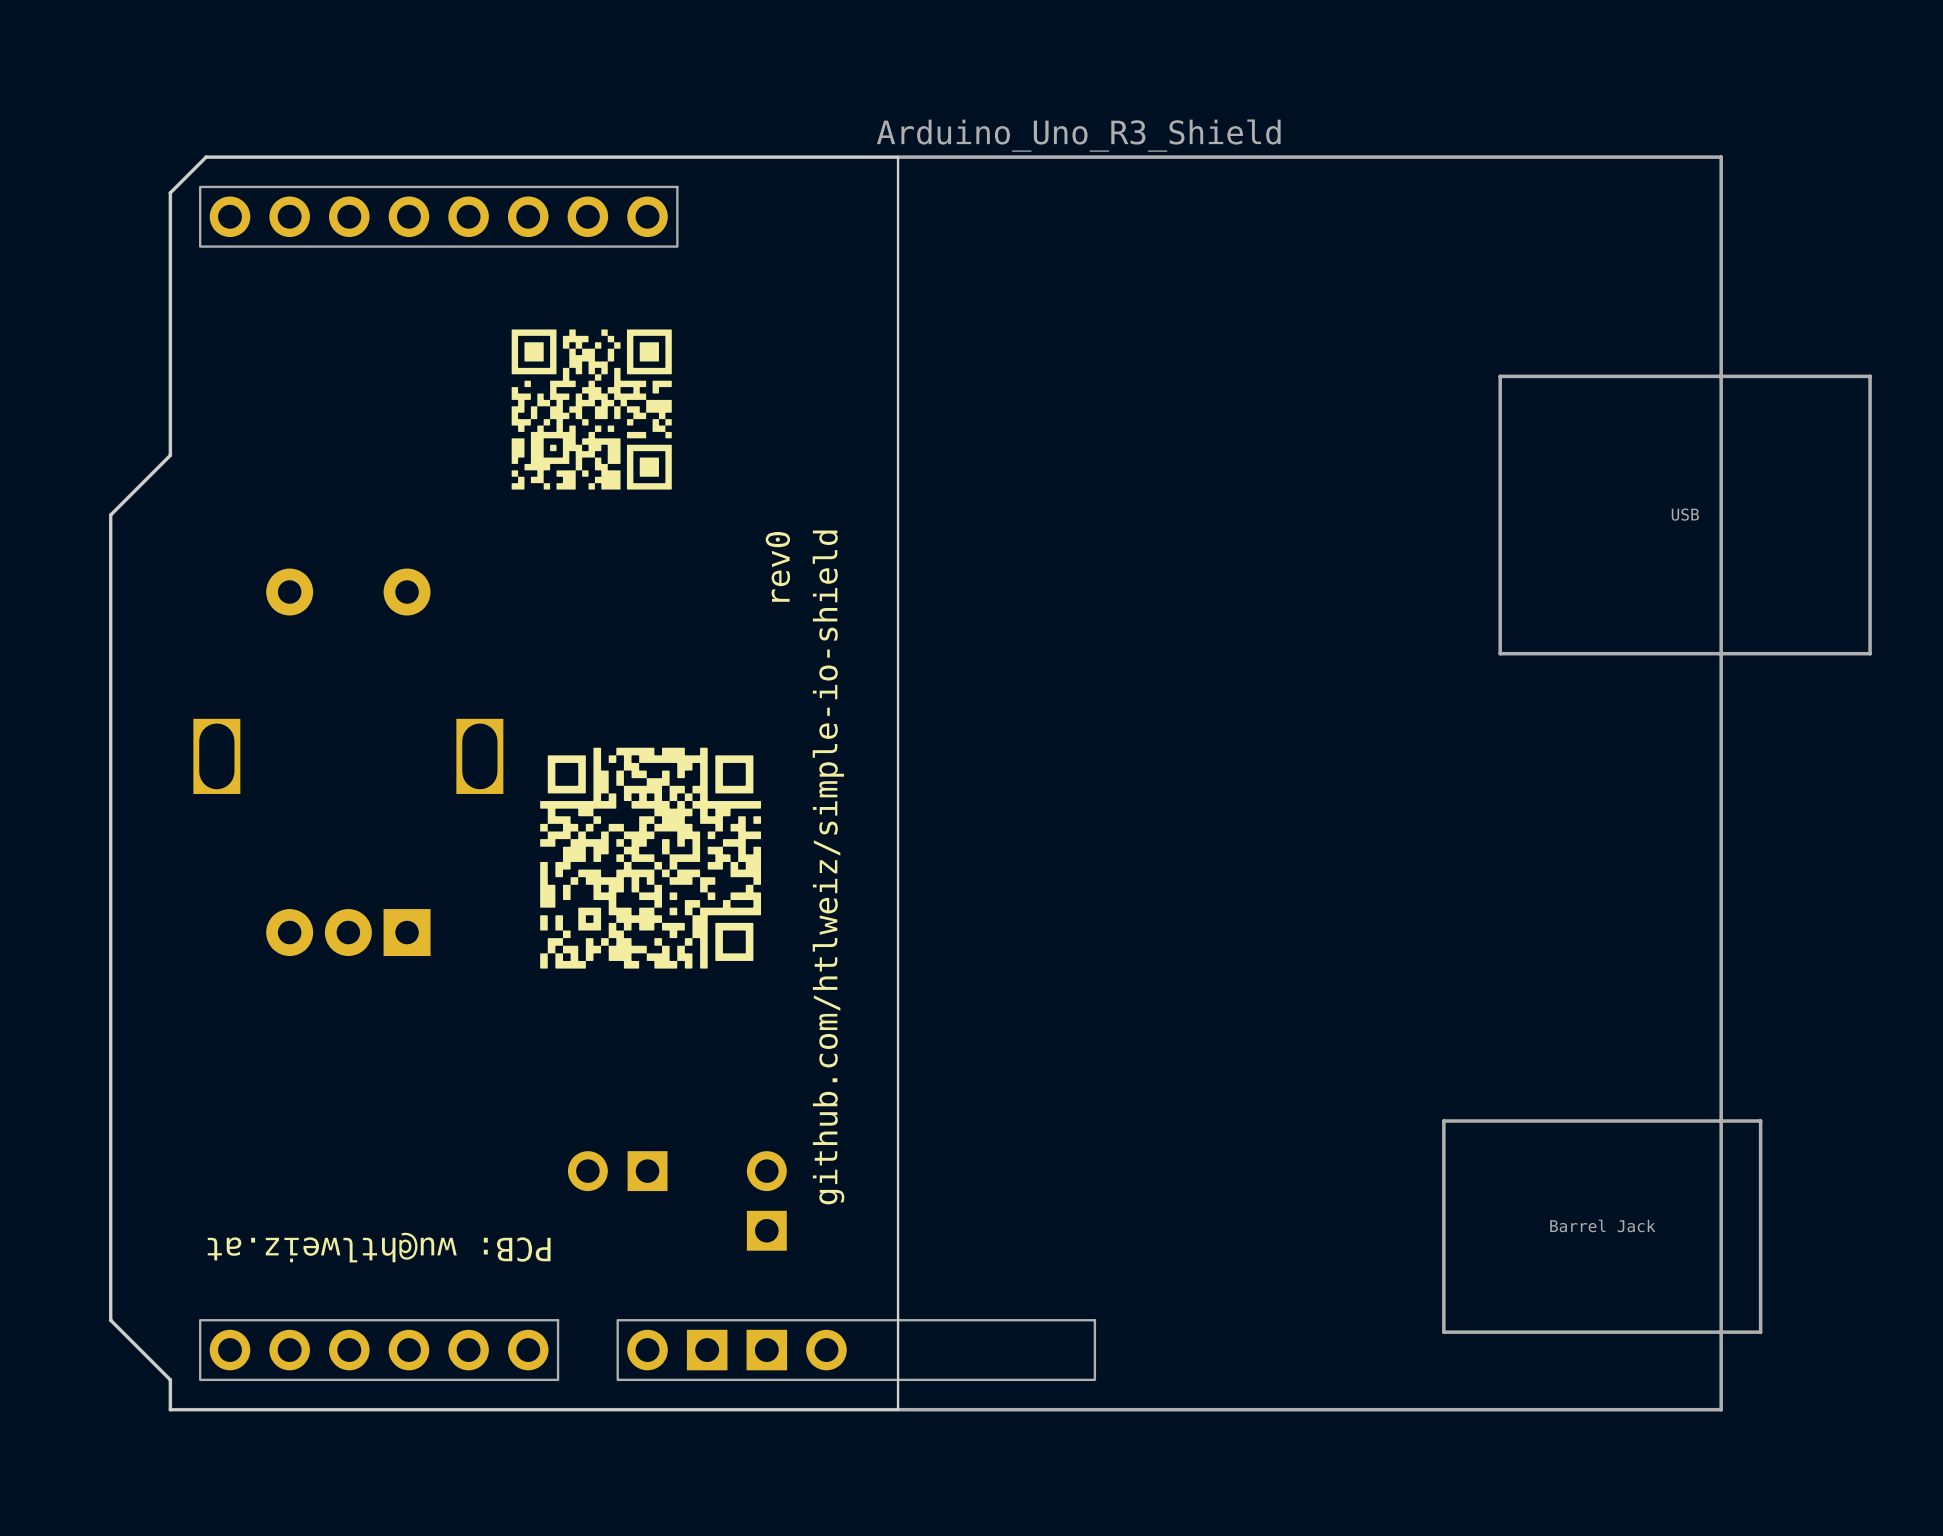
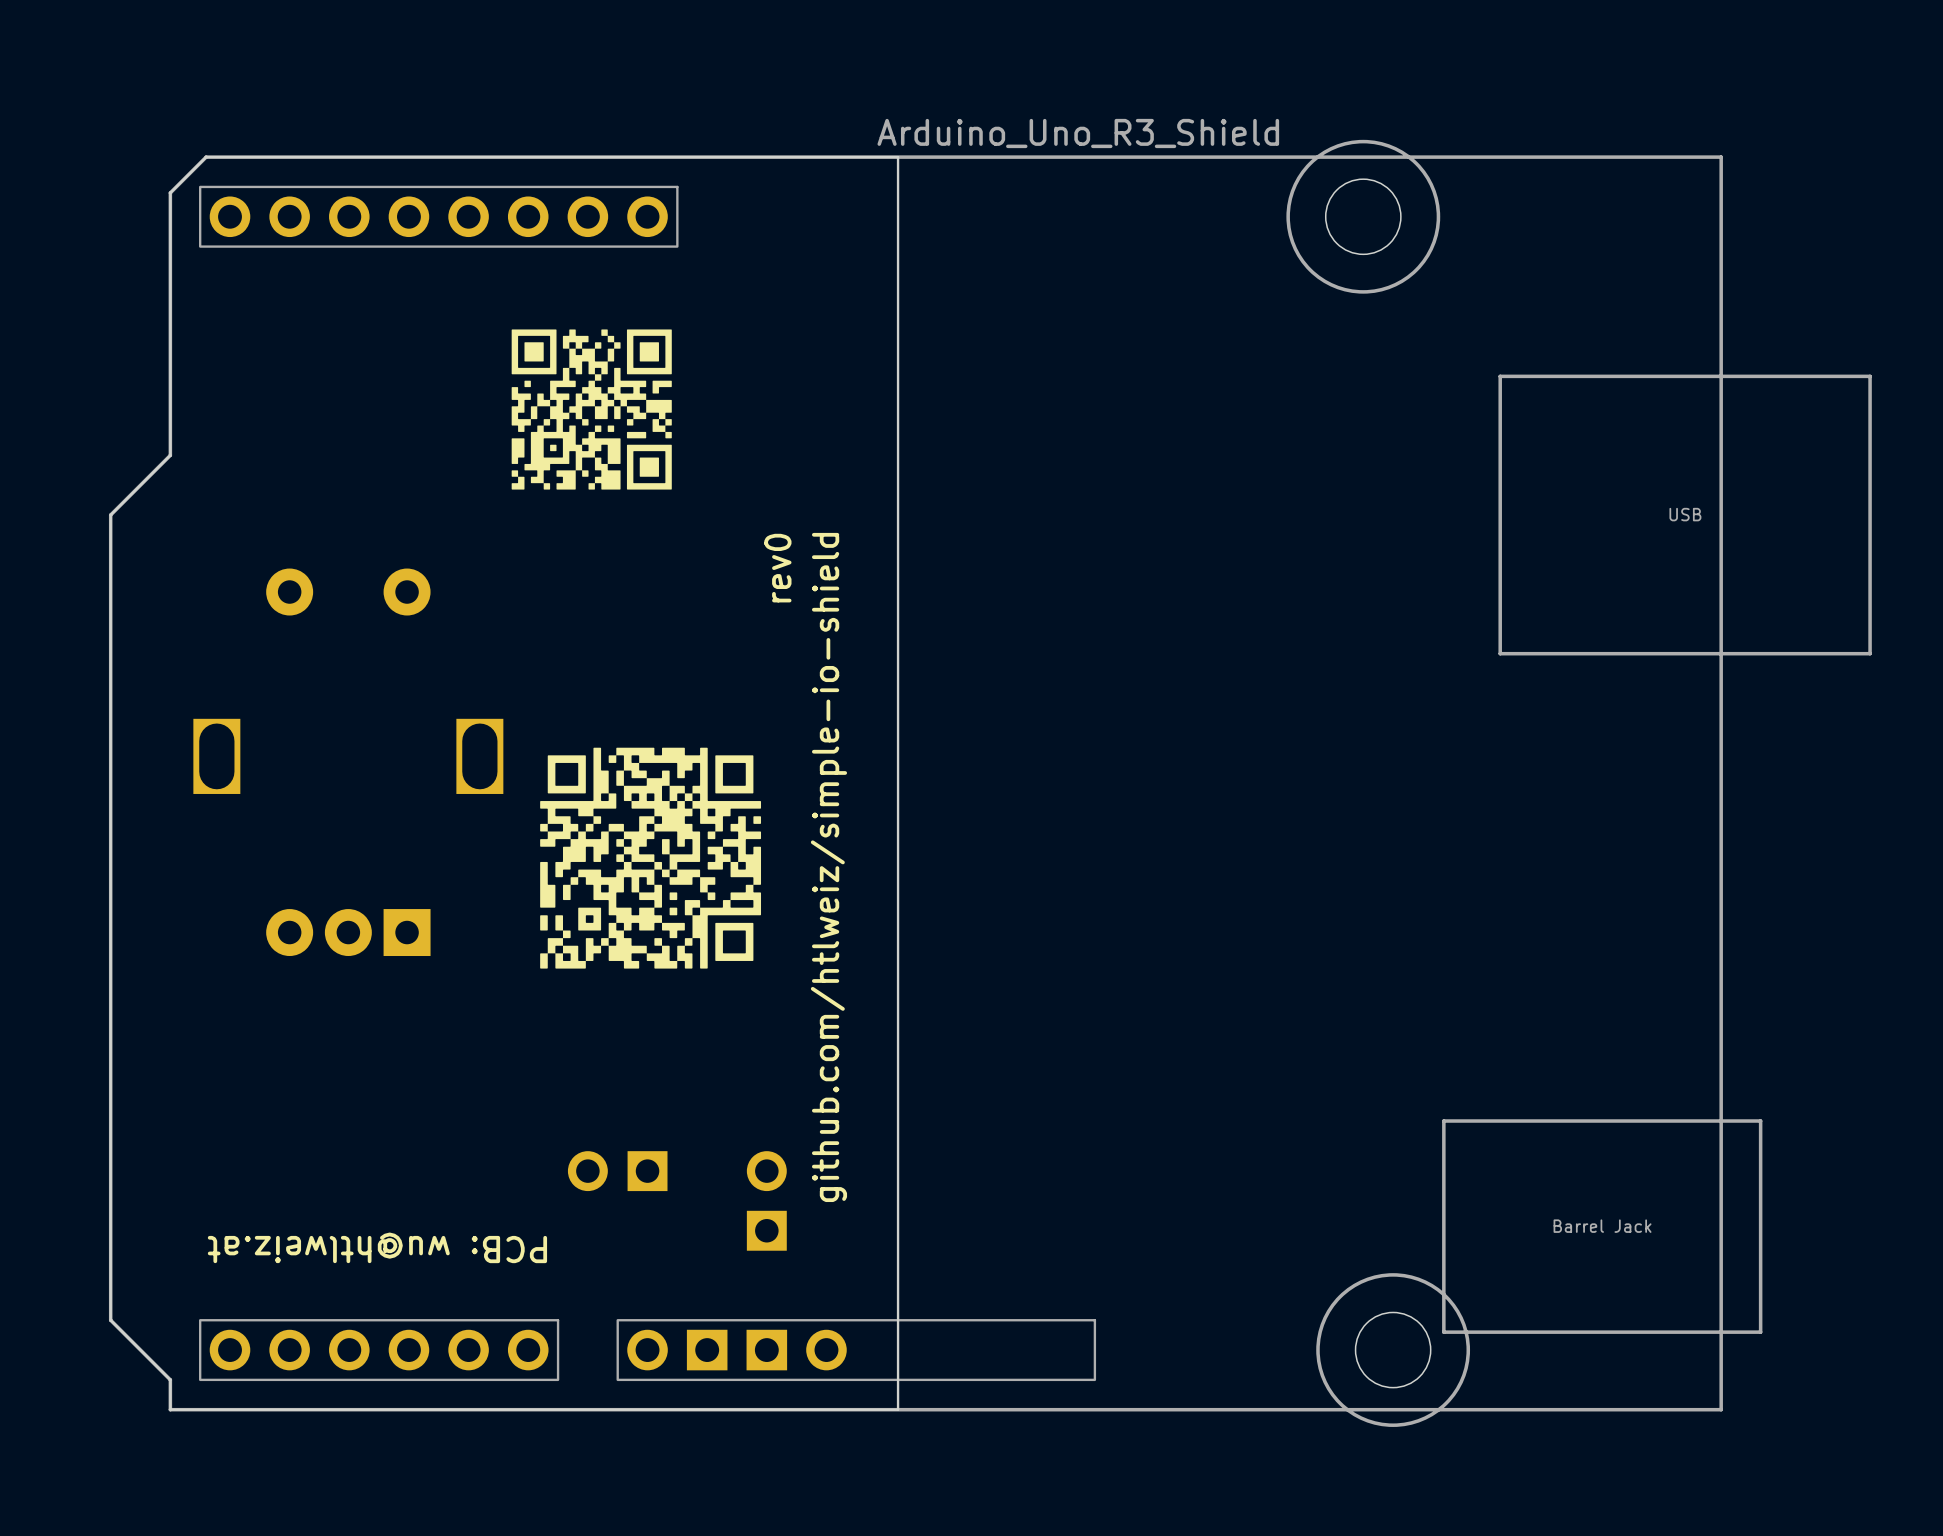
part footprint: [108, 155, 1872, 1412] -> [108, 139, 1872, 1427]

